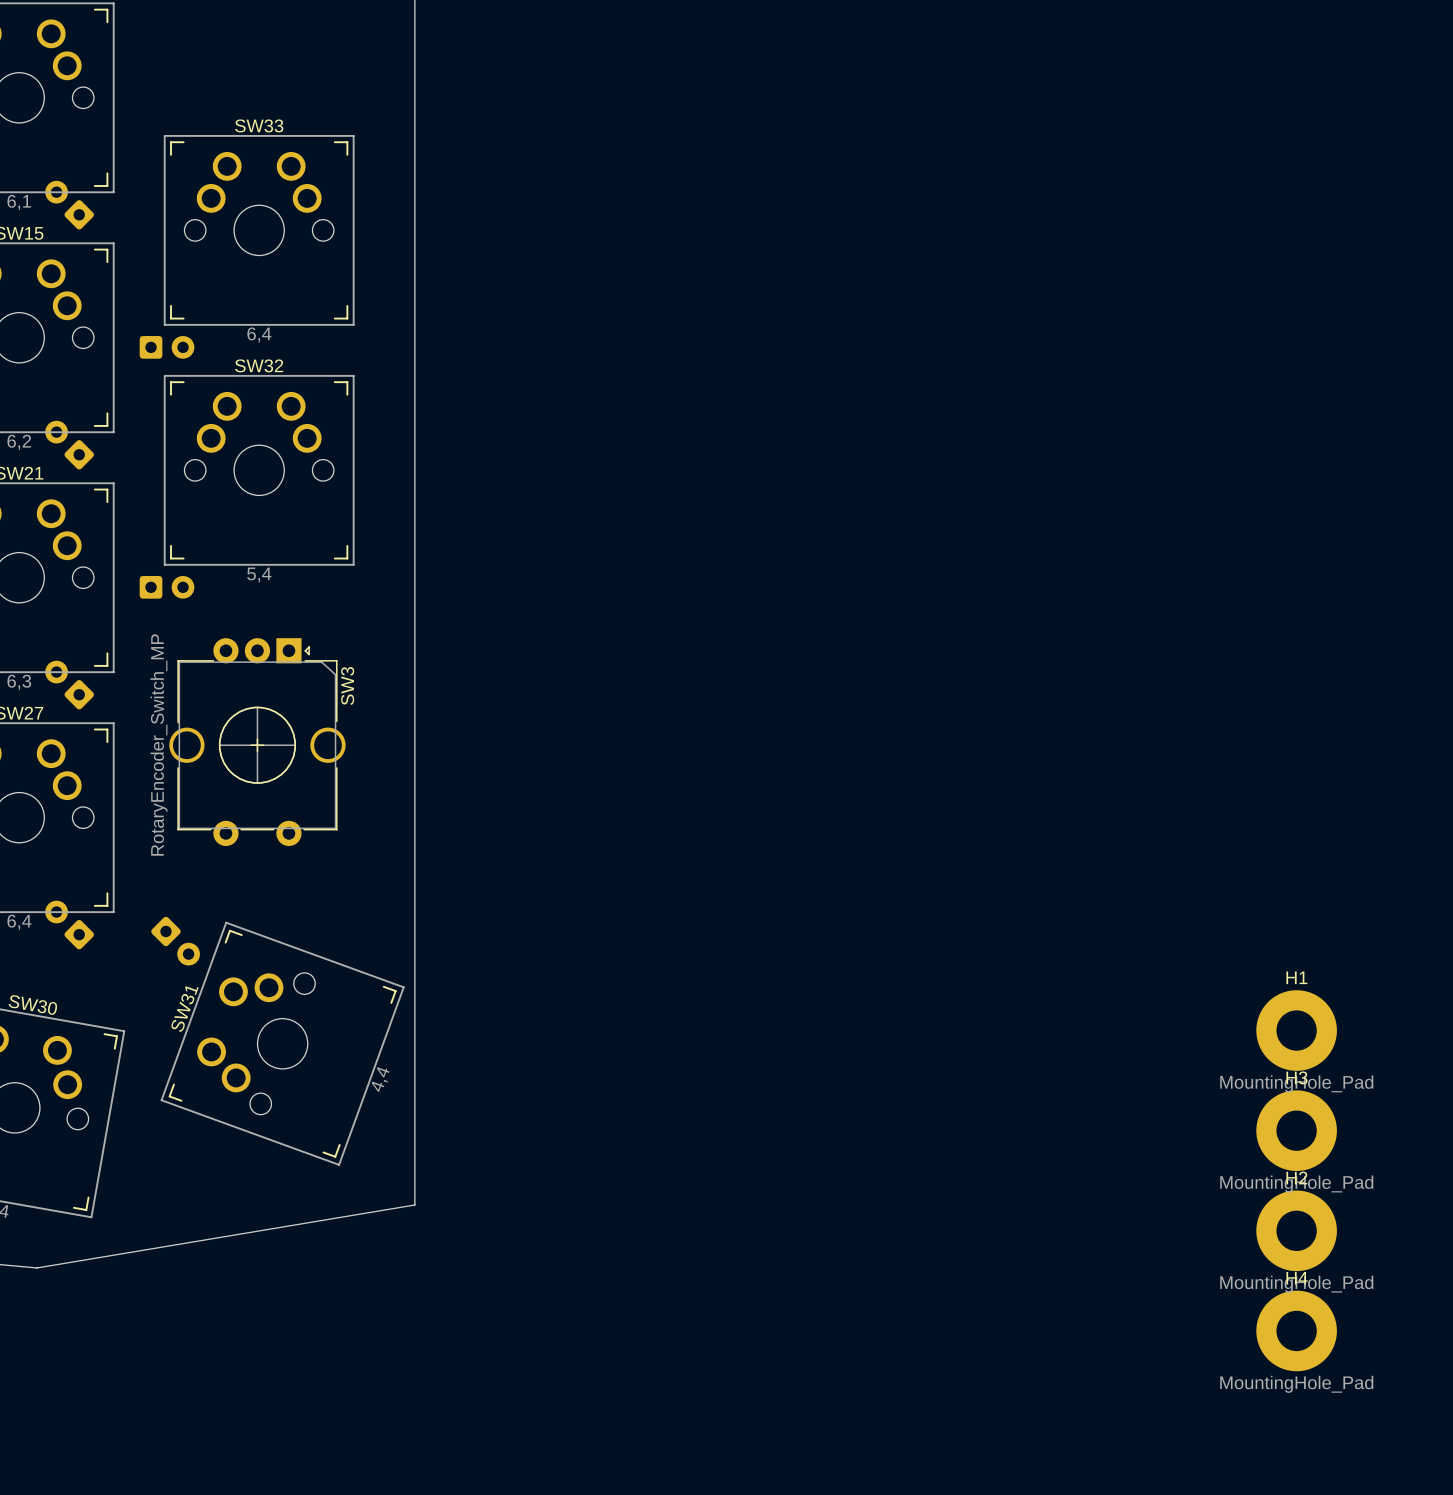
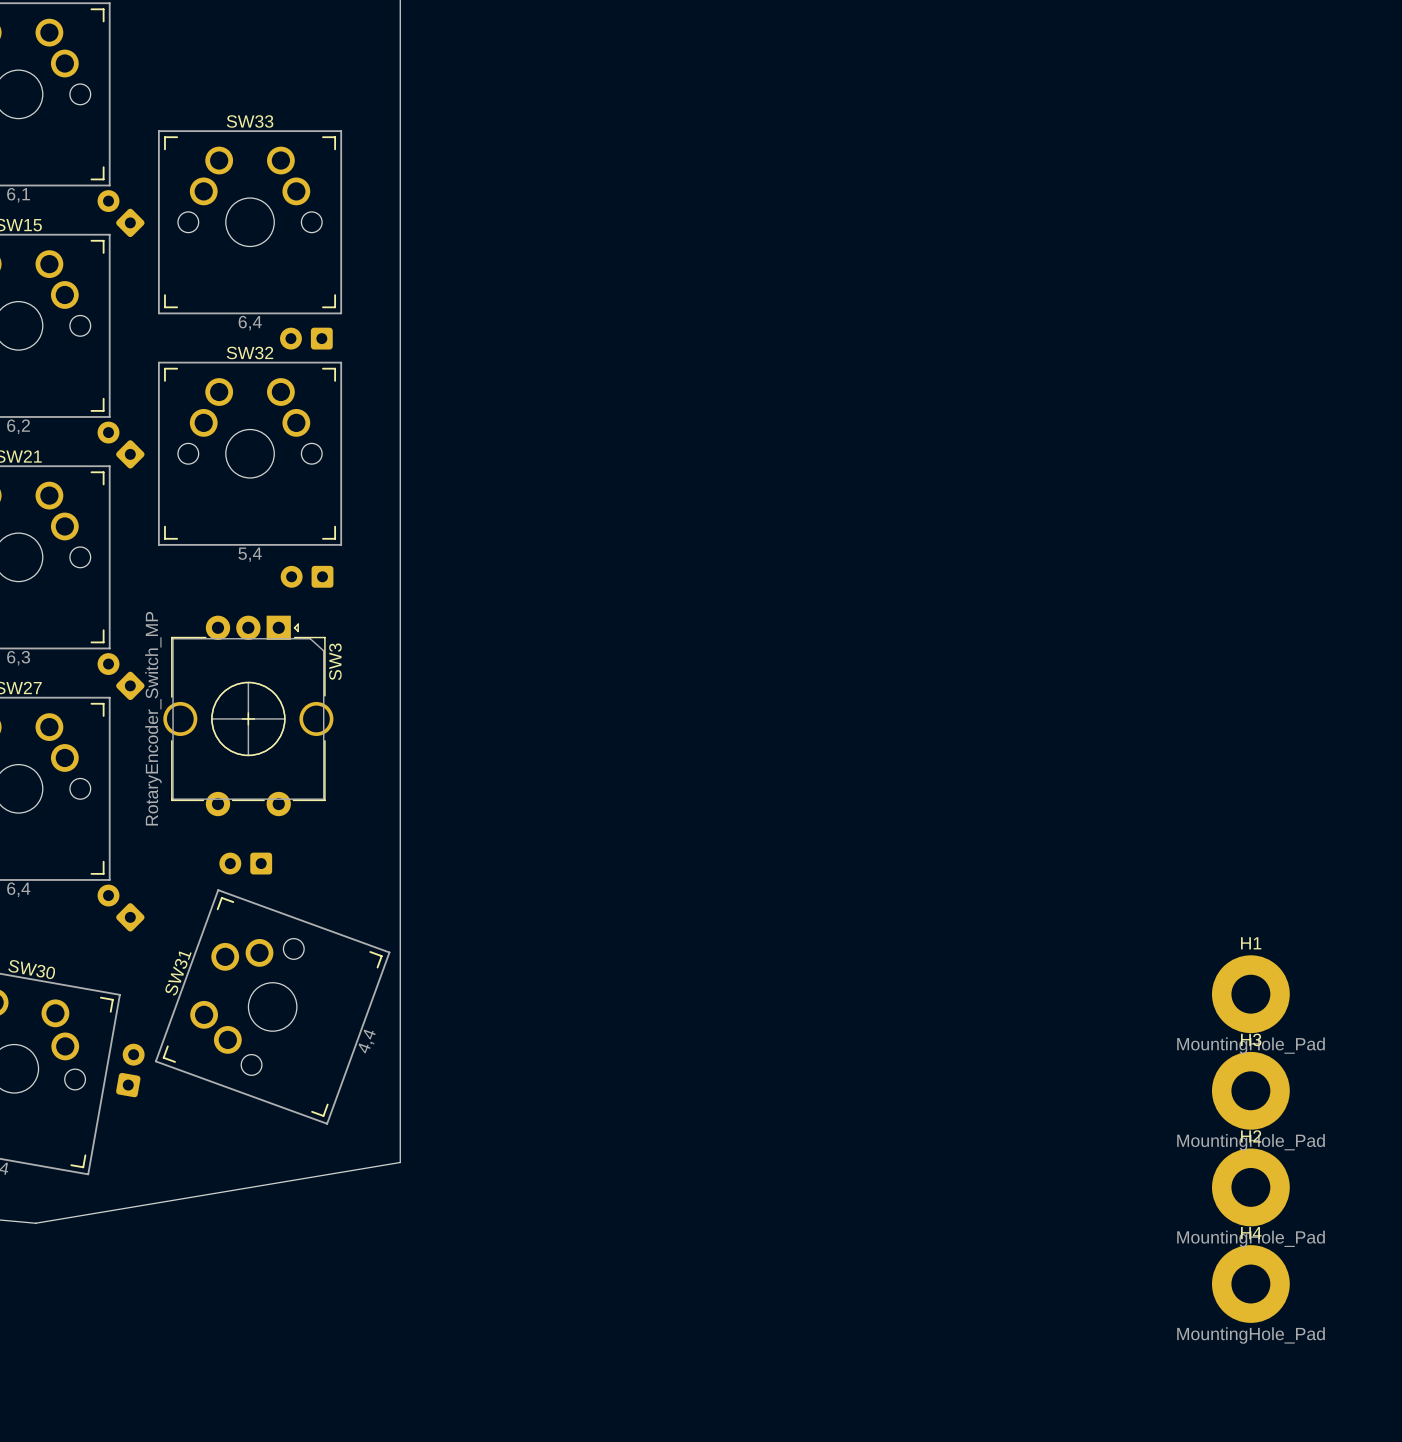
part position: (69, 205) -> (121, 213)
part: (167, 347) -> none
part: none -> (306, 338)
part position: (69, 445) -> (121, 445)
part: (167, 587) -> none
part: none -> (307, 576)
part position: (69, 685) -> (121, 676)
part: none -> (245, 863)
part: (69, 925) -> none
part: none -> (121, 908)
part: (175, 941) -> none
part: none -> (130, 1070)

